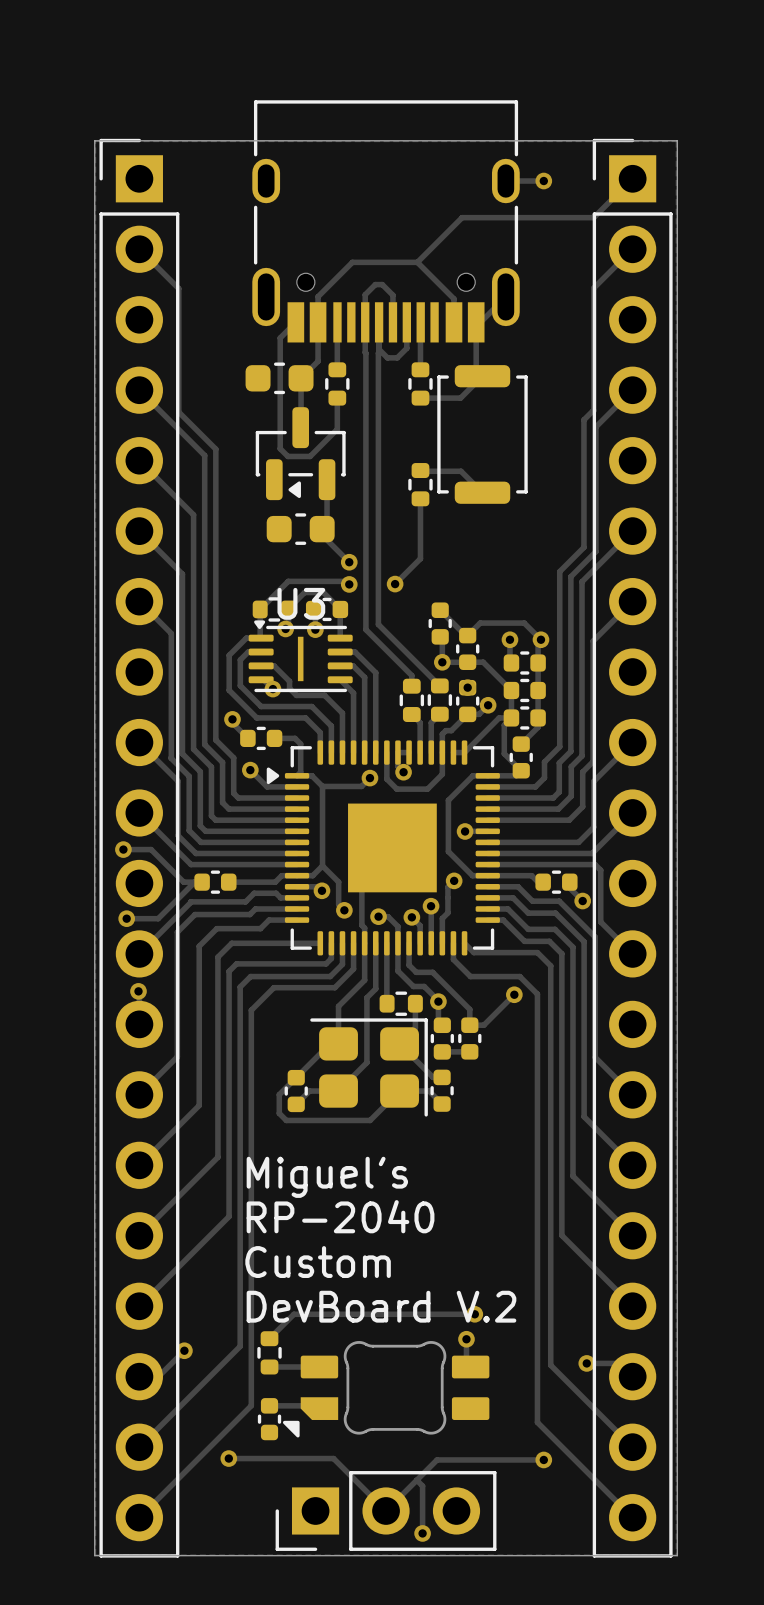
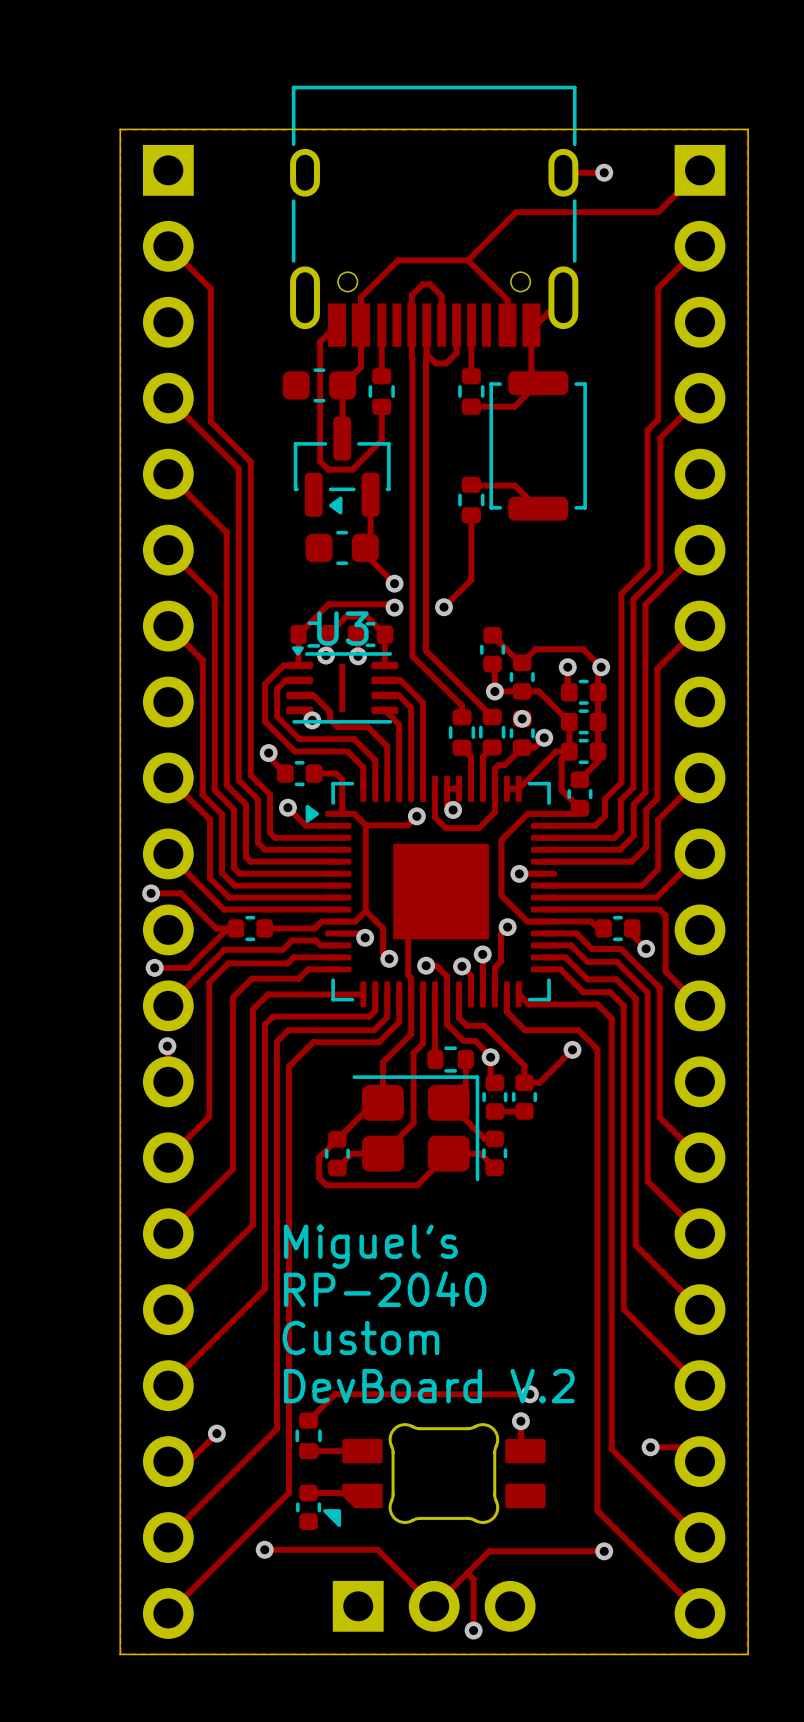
part side: top (139, 848) -> bottom (168, 891)
part side: top (632, 848) -> bottom (700, 891)
part side: top (386, 1510) -> bottom (434, 1606)

